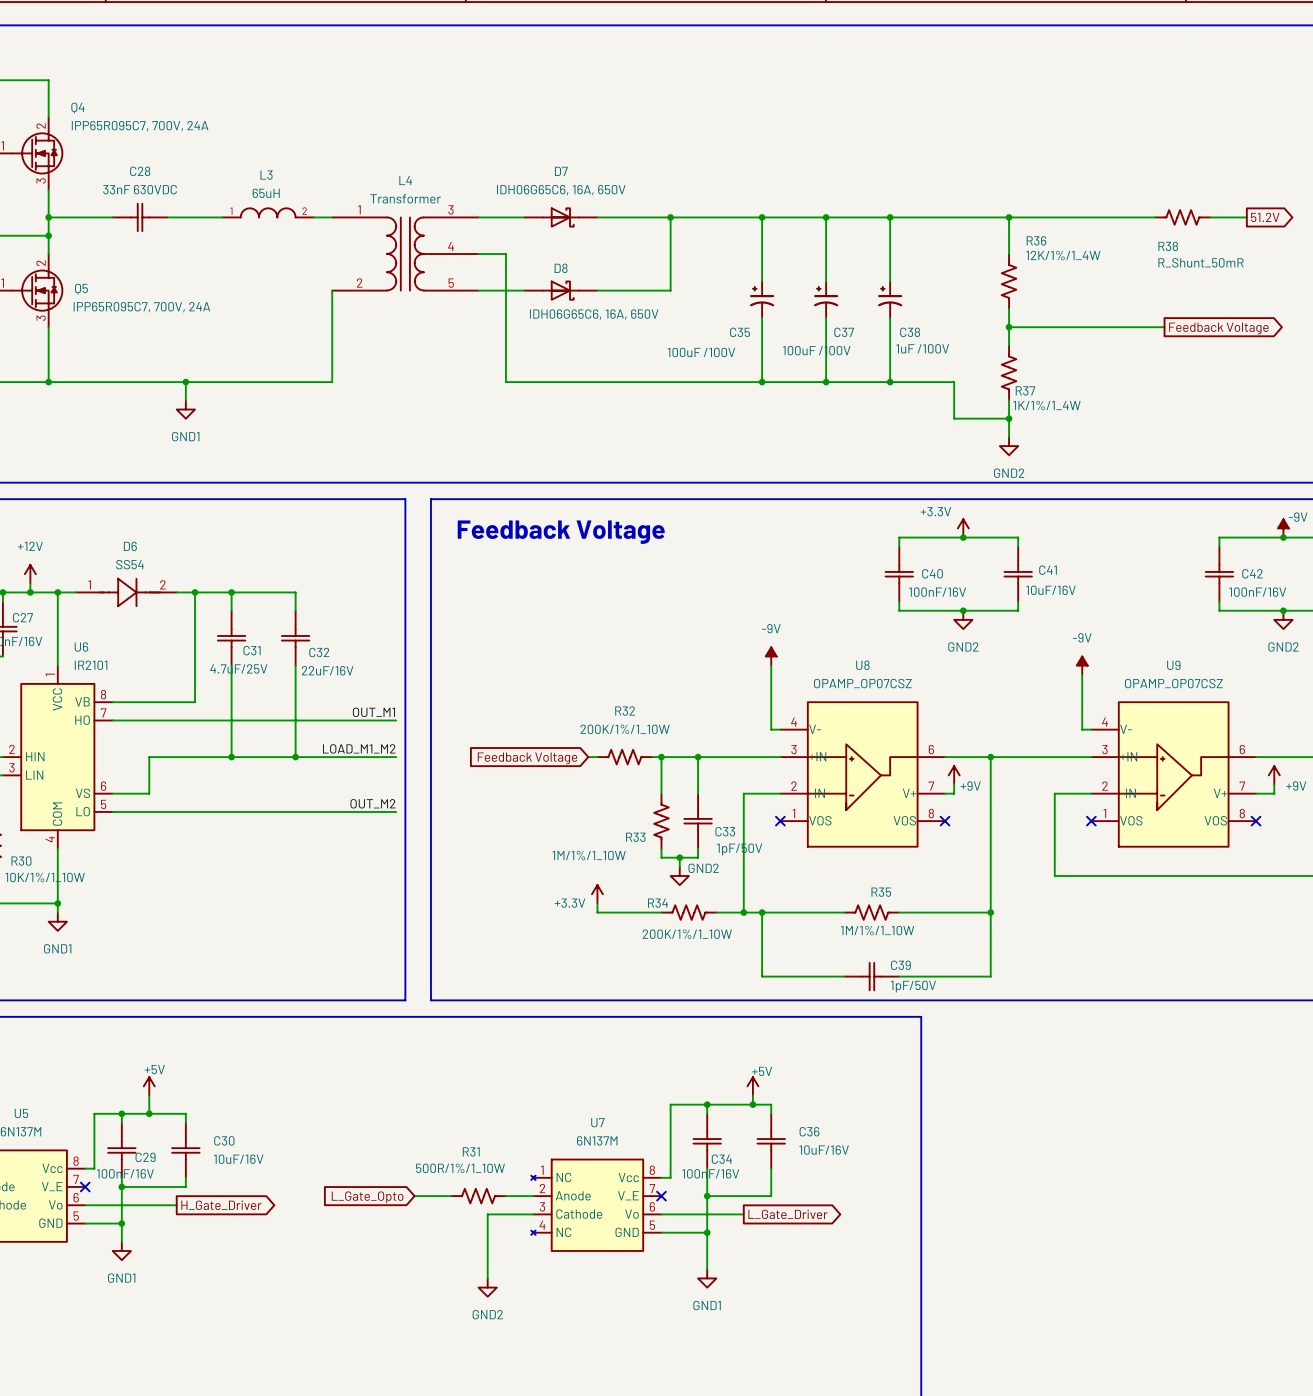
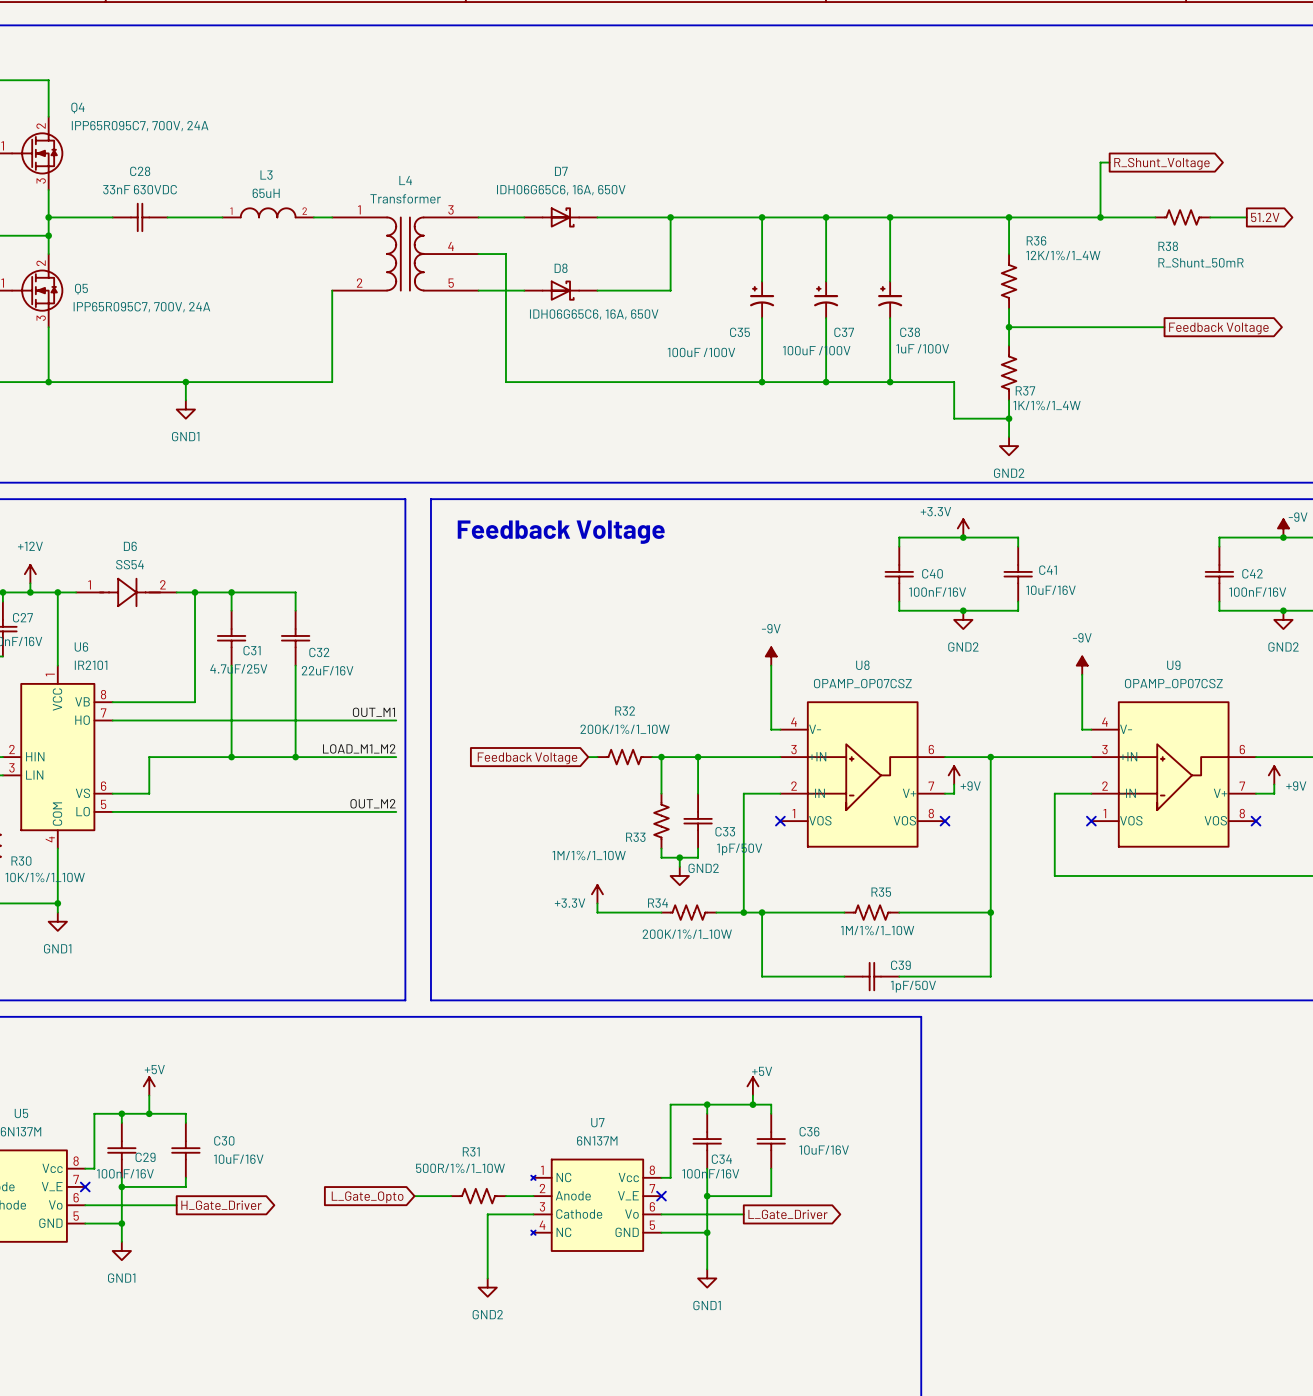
wire: none -> (1109, 162) (1100, 162) (1100, 217)
global label: none -> R_Shunt_Voltage (1161, 163)
junction: none -> (1100, 217)

